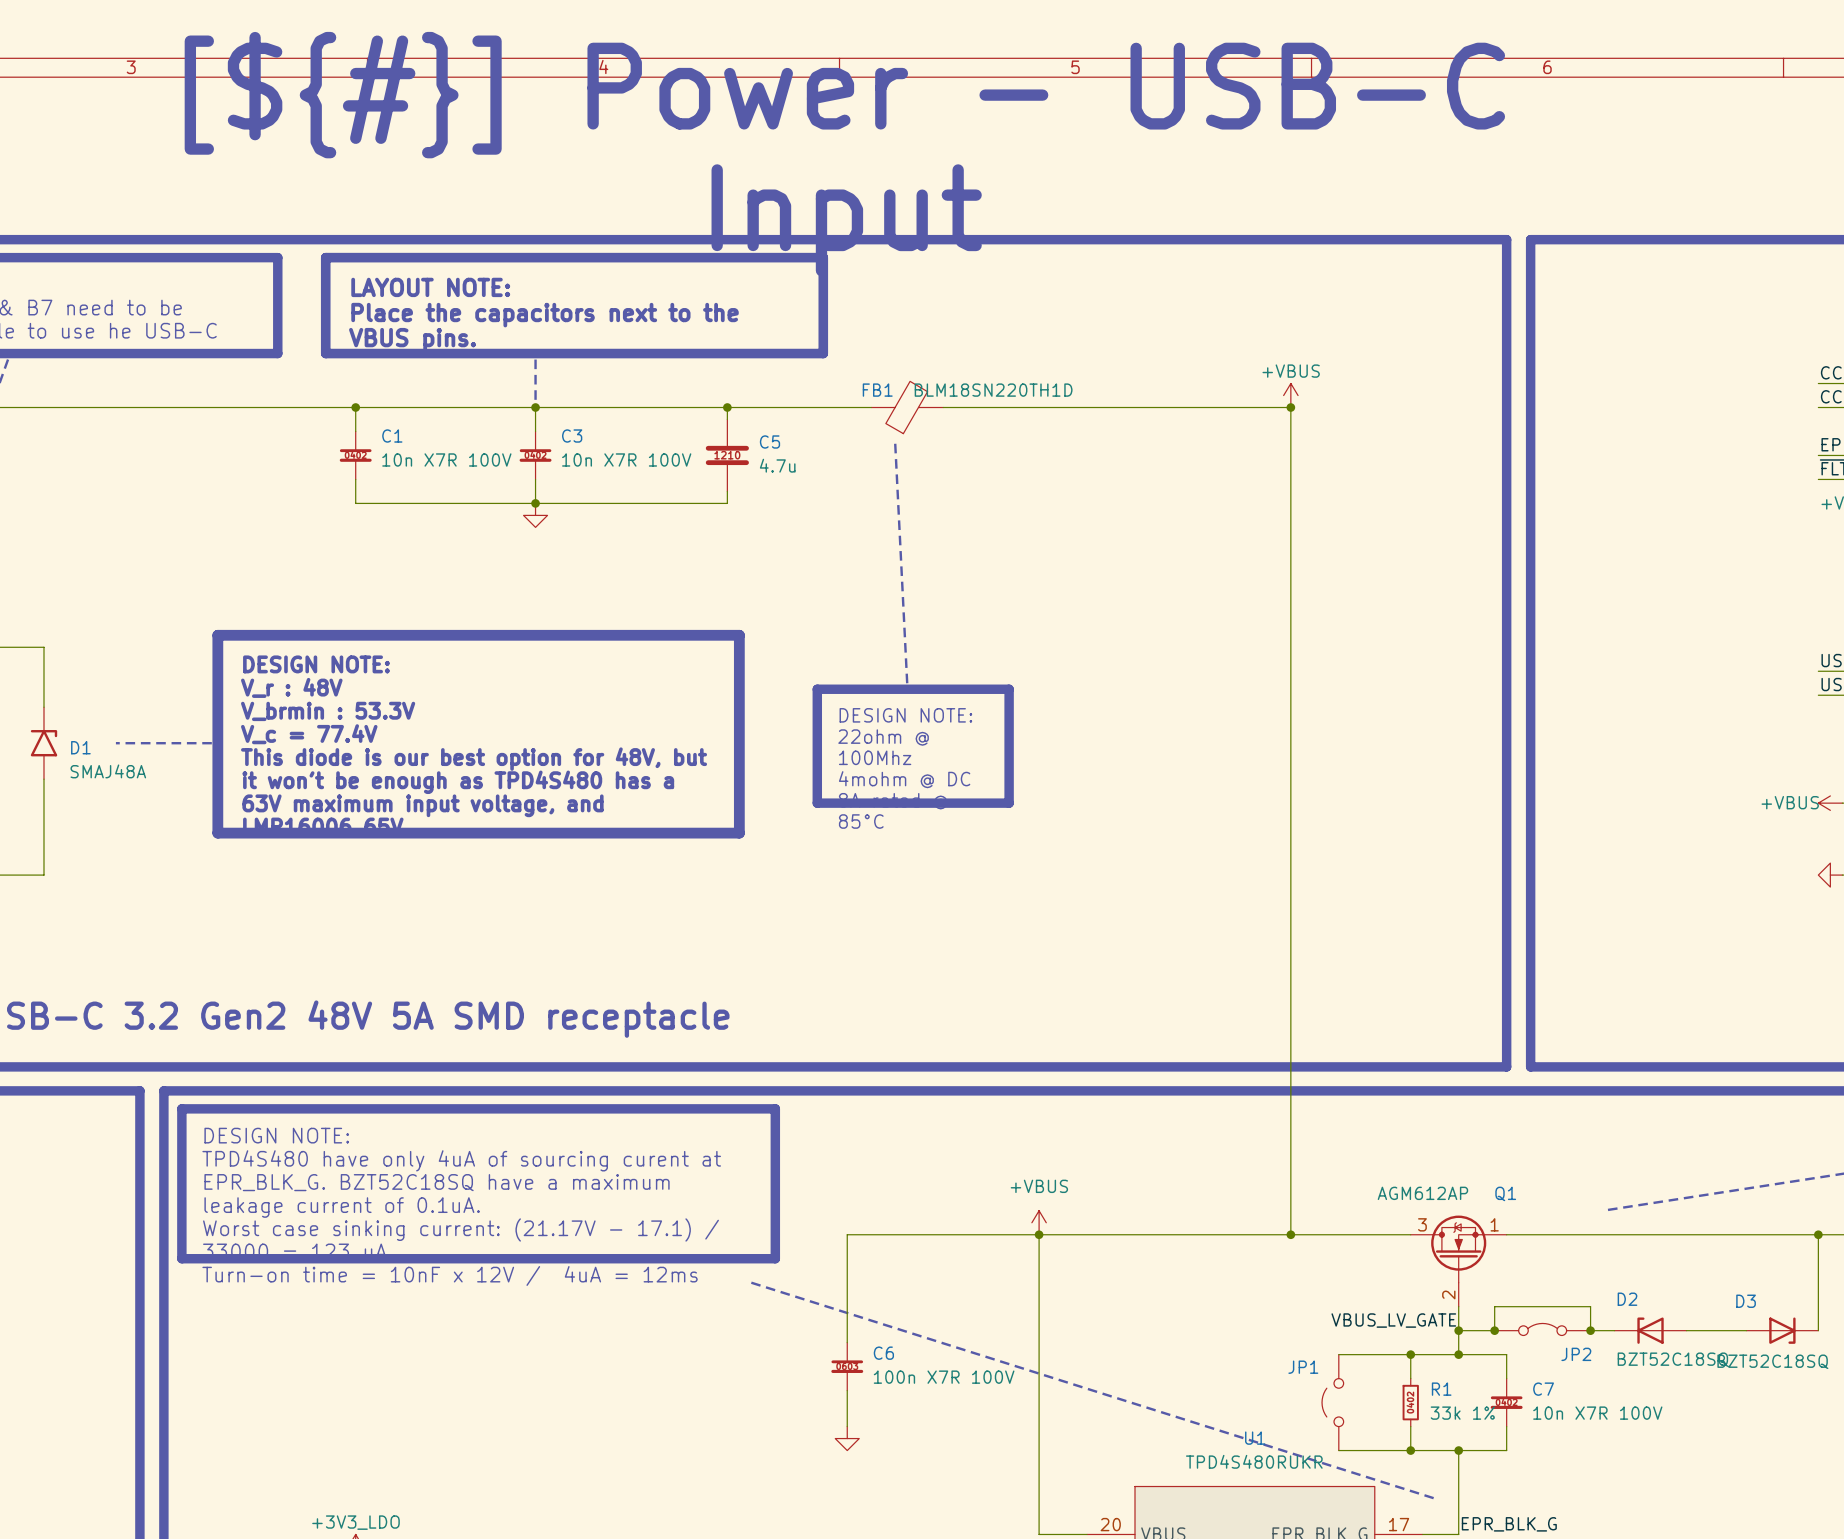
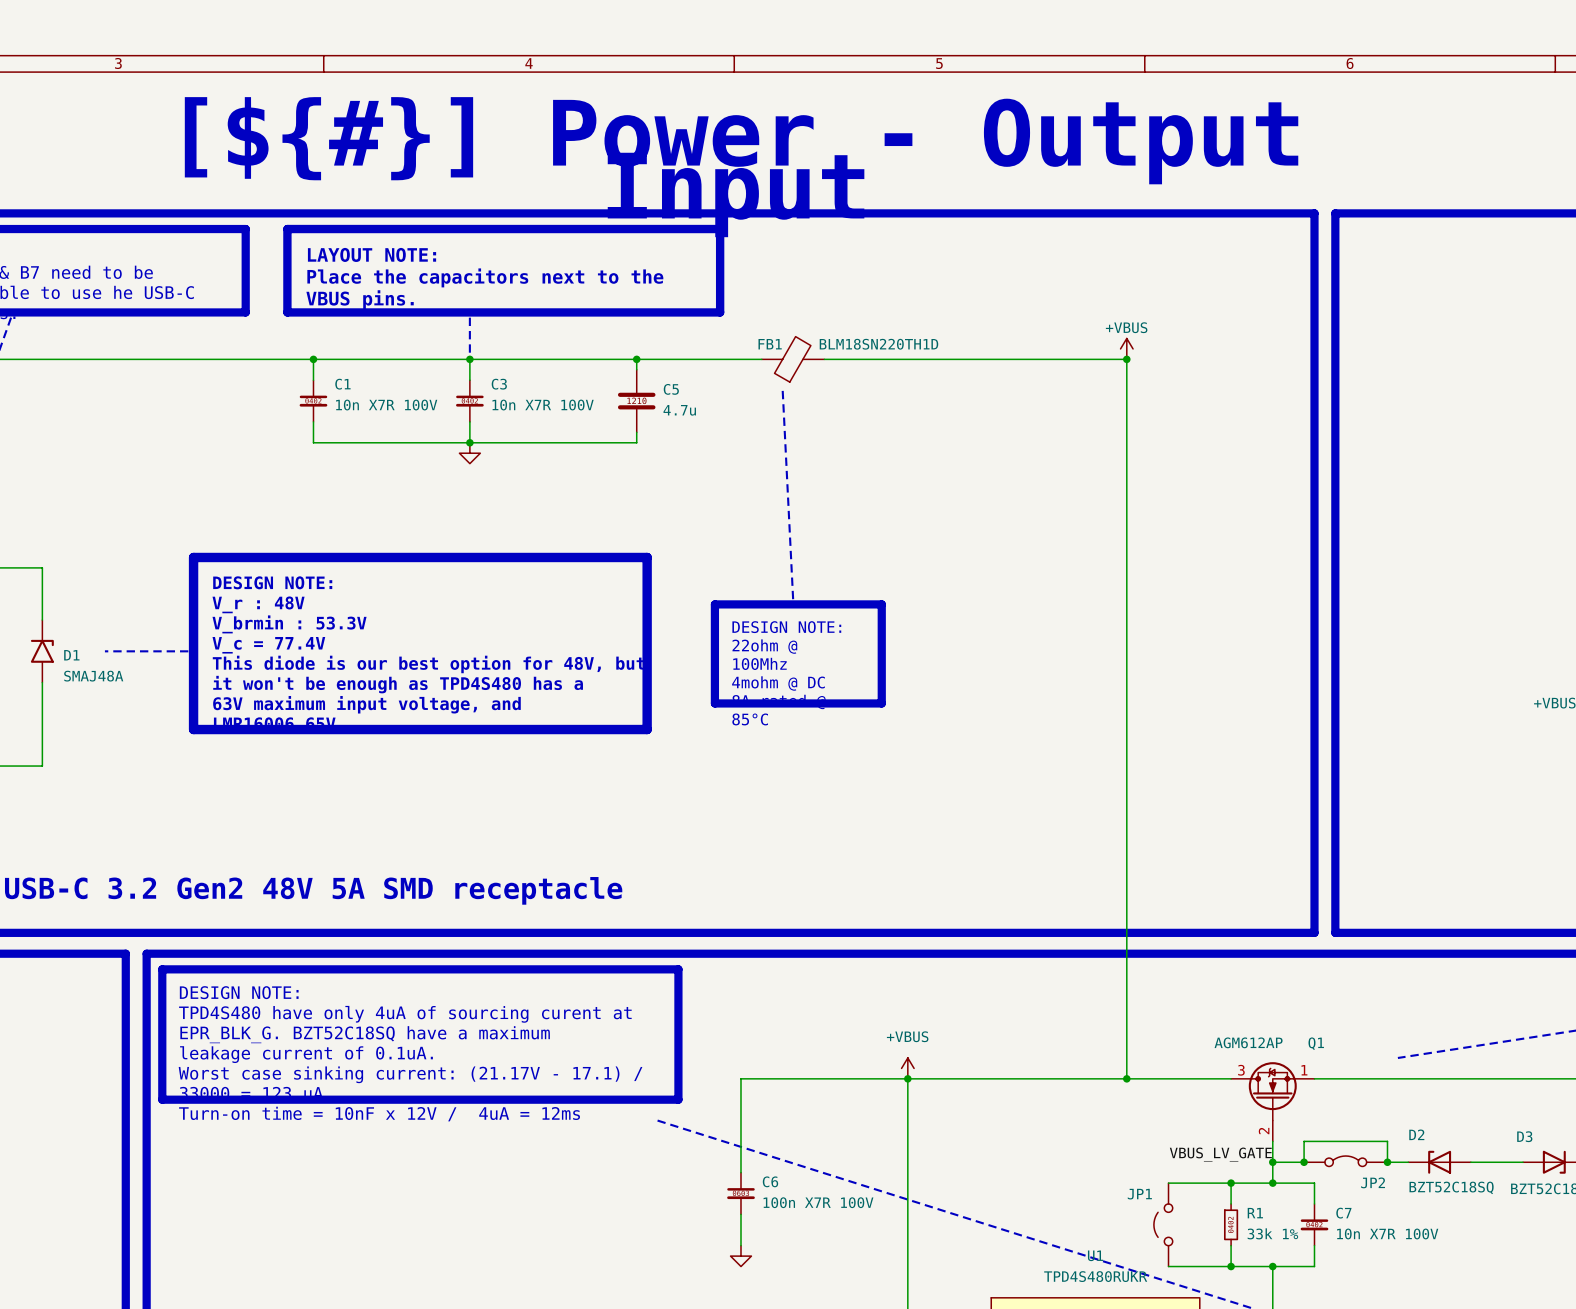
text: [${#}] Power - USB-C (844, 95) -> [${#}] Power - Output (741, 140)

